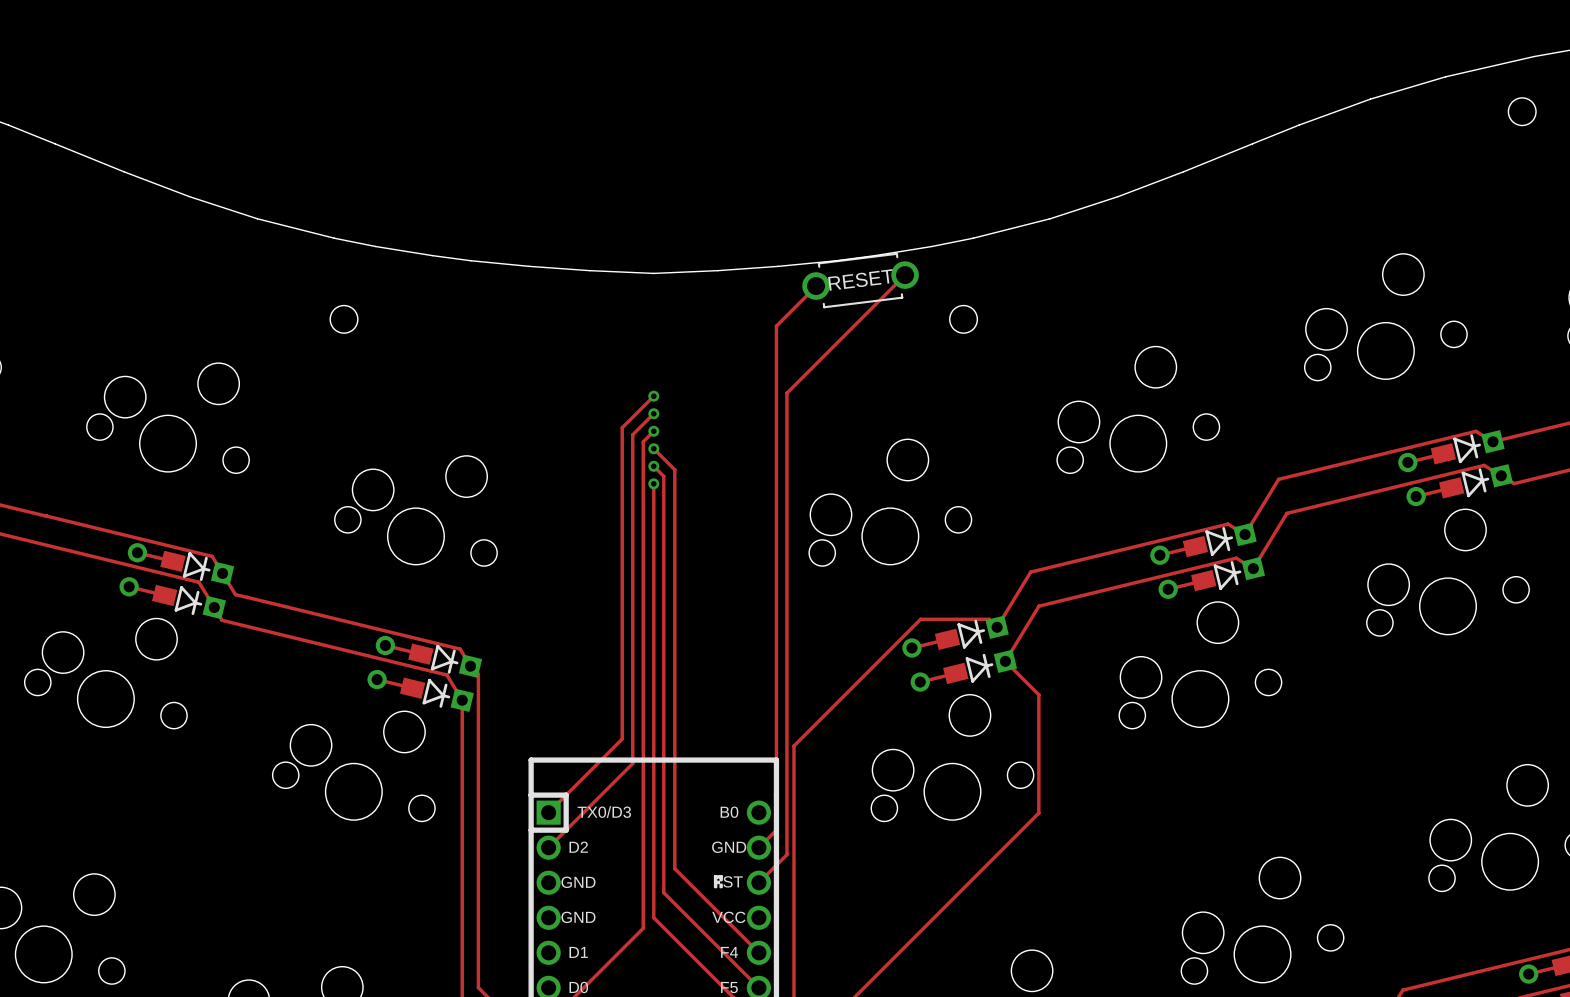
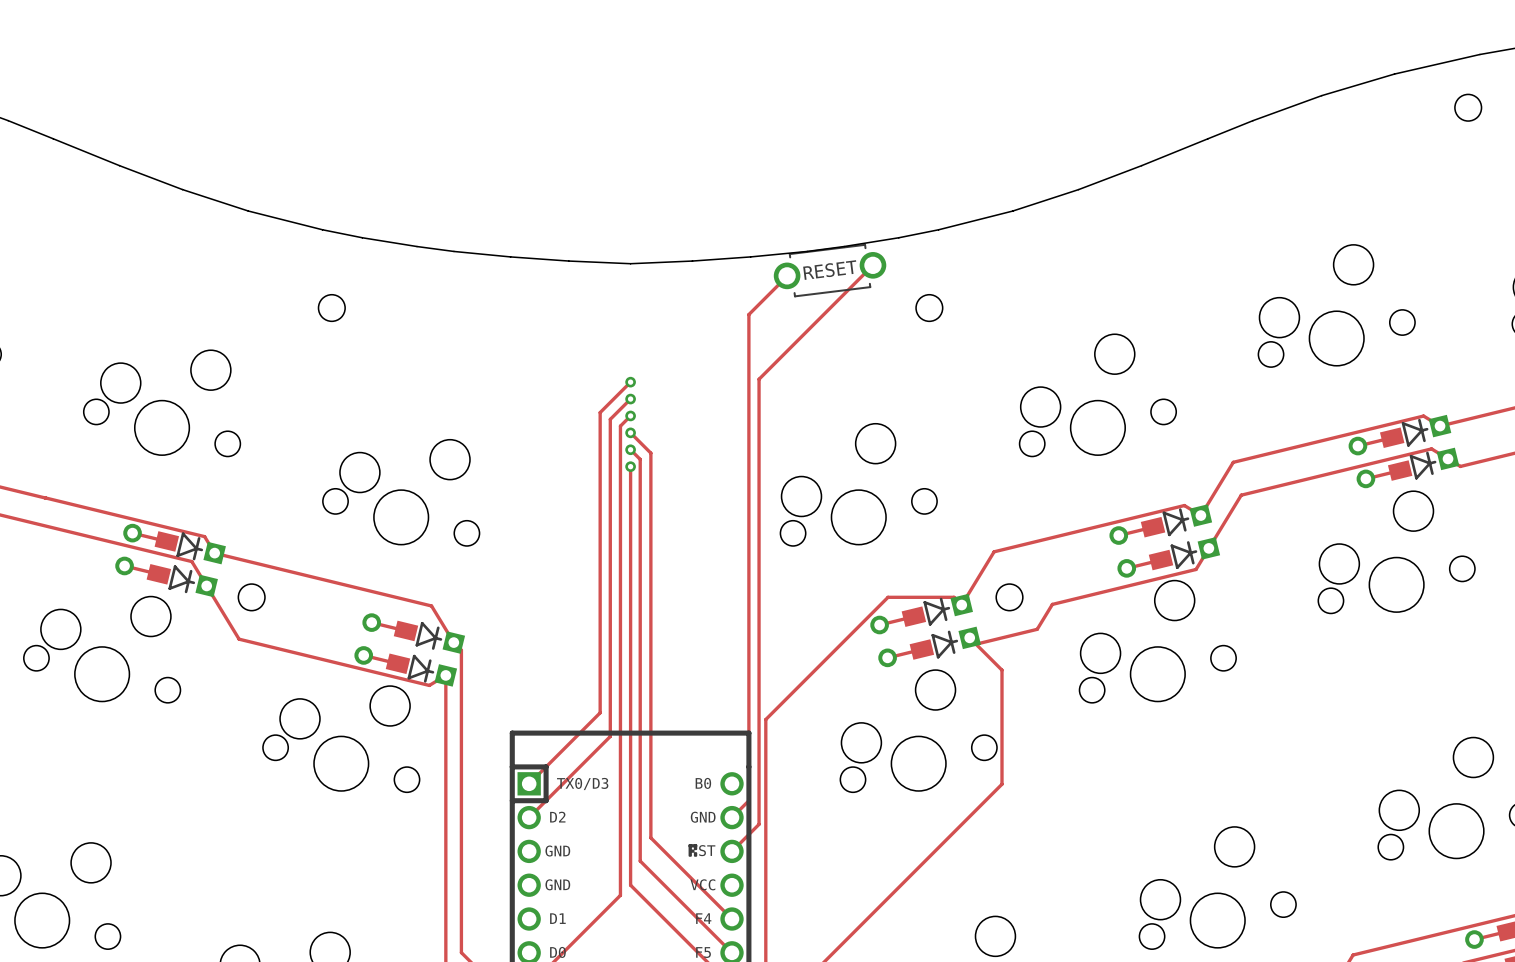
track: (1253, 568) (1236, 558) (1038, 606) (1005, 661) -> (1208, 548) (1196, 569) (1052, 604) (1037, 629) (978, 643) (969, 637)
track: (222, 573) (235, 594) (247, 597) -> none
track: (247, 597) (460, 649) (470, 666) (478, 674) -> (214, 553) (431, 605) (453, 642) (461, 650)
round board edge: none -> [237, 583, 266, 612]
round board edge: none -> [995, 583, 1024, 612]
track: (222, 620) (446, 675) (462, 700) -> (214, 598) (239, 639) (429, 685) (445, 675)

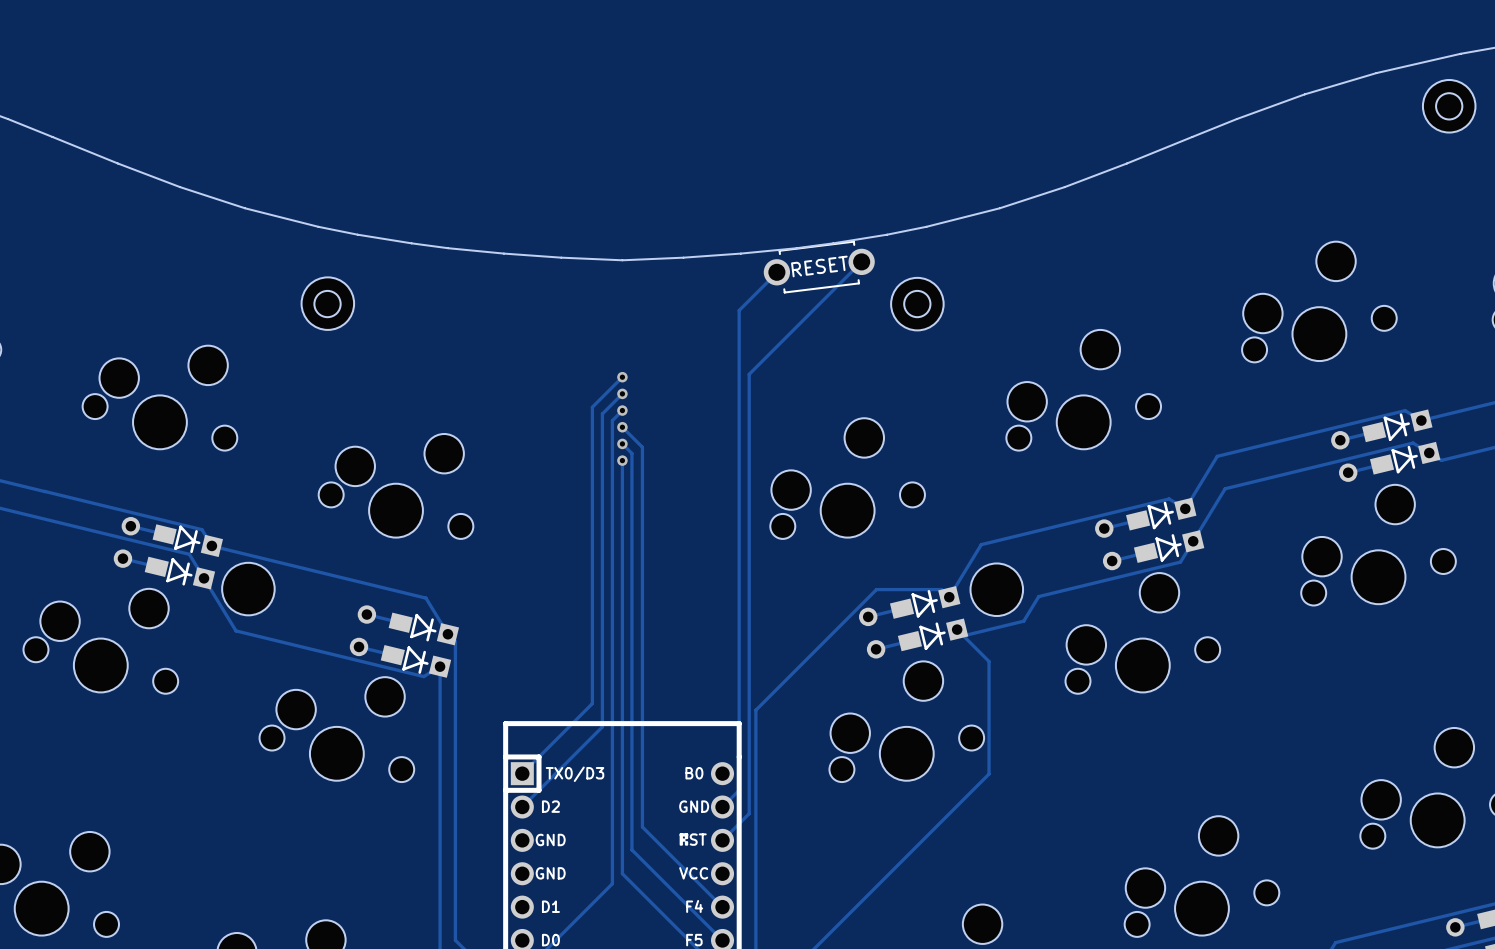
part: none -> (1449, 106)
part: none -> (327, 303)
part: none -> (917, 304)
round board edge: [237, 583, 266, 612] -> none
round board edge: [995, 583, 1024, 612] -> none
part: none -> (248, 589)
part: none -> (996, 589)

